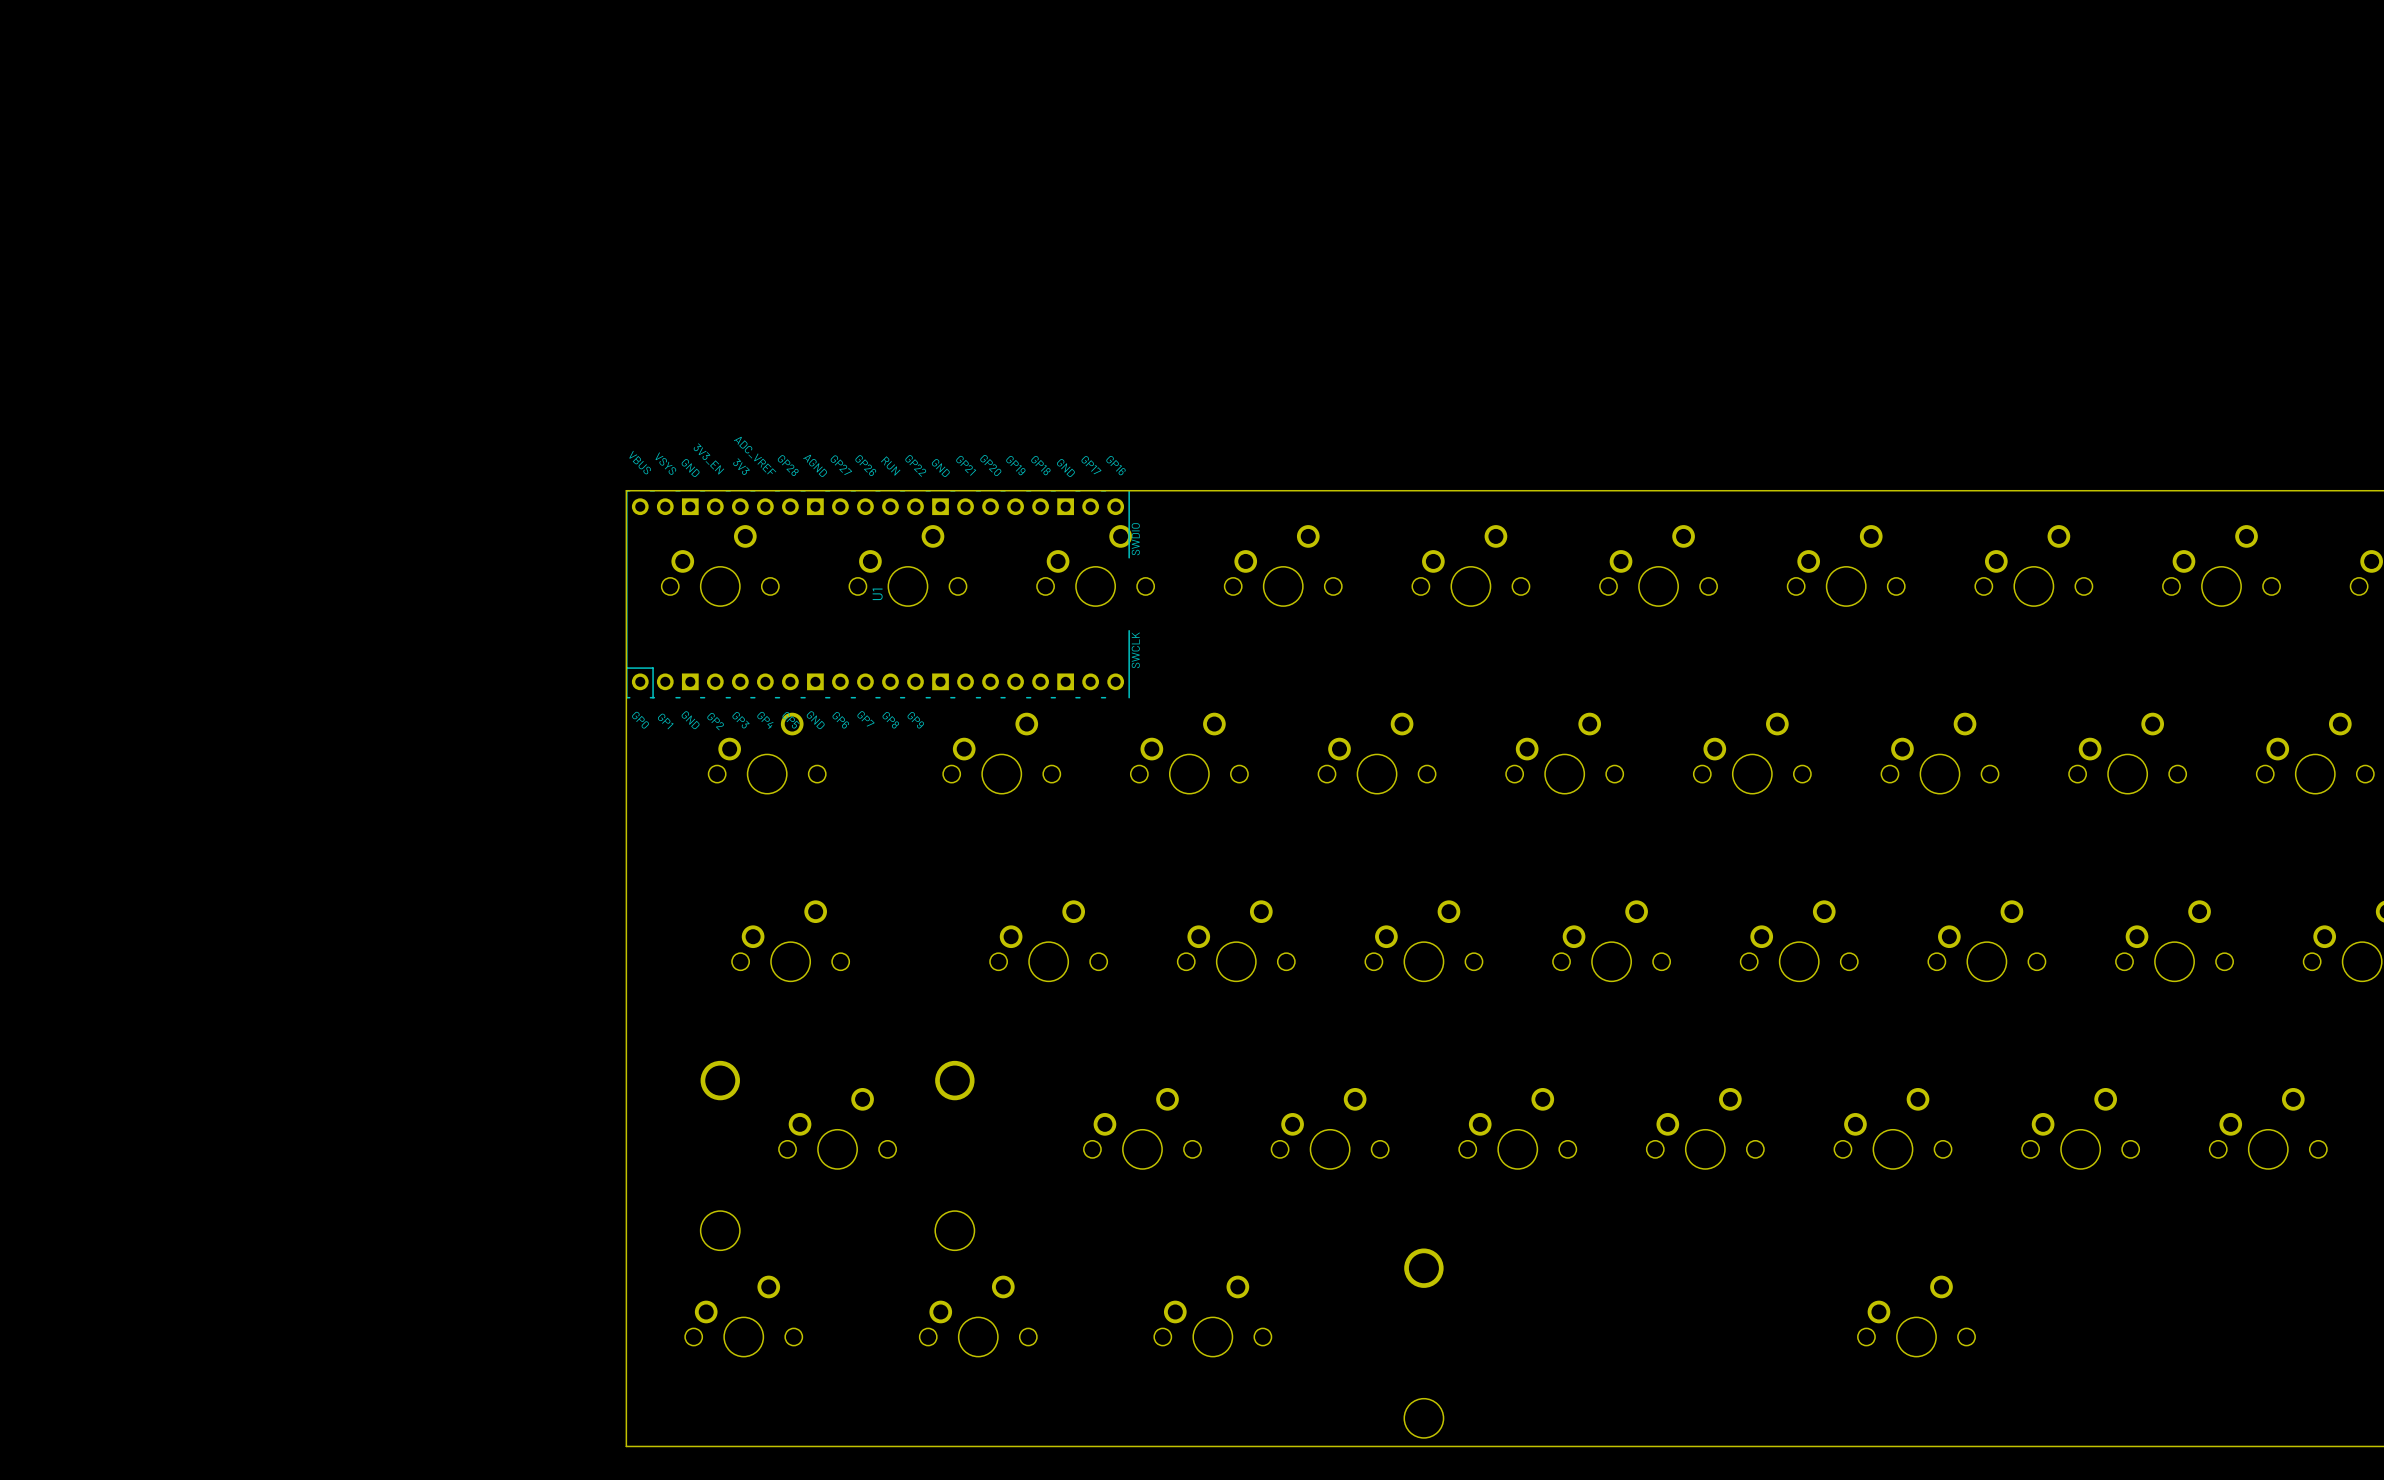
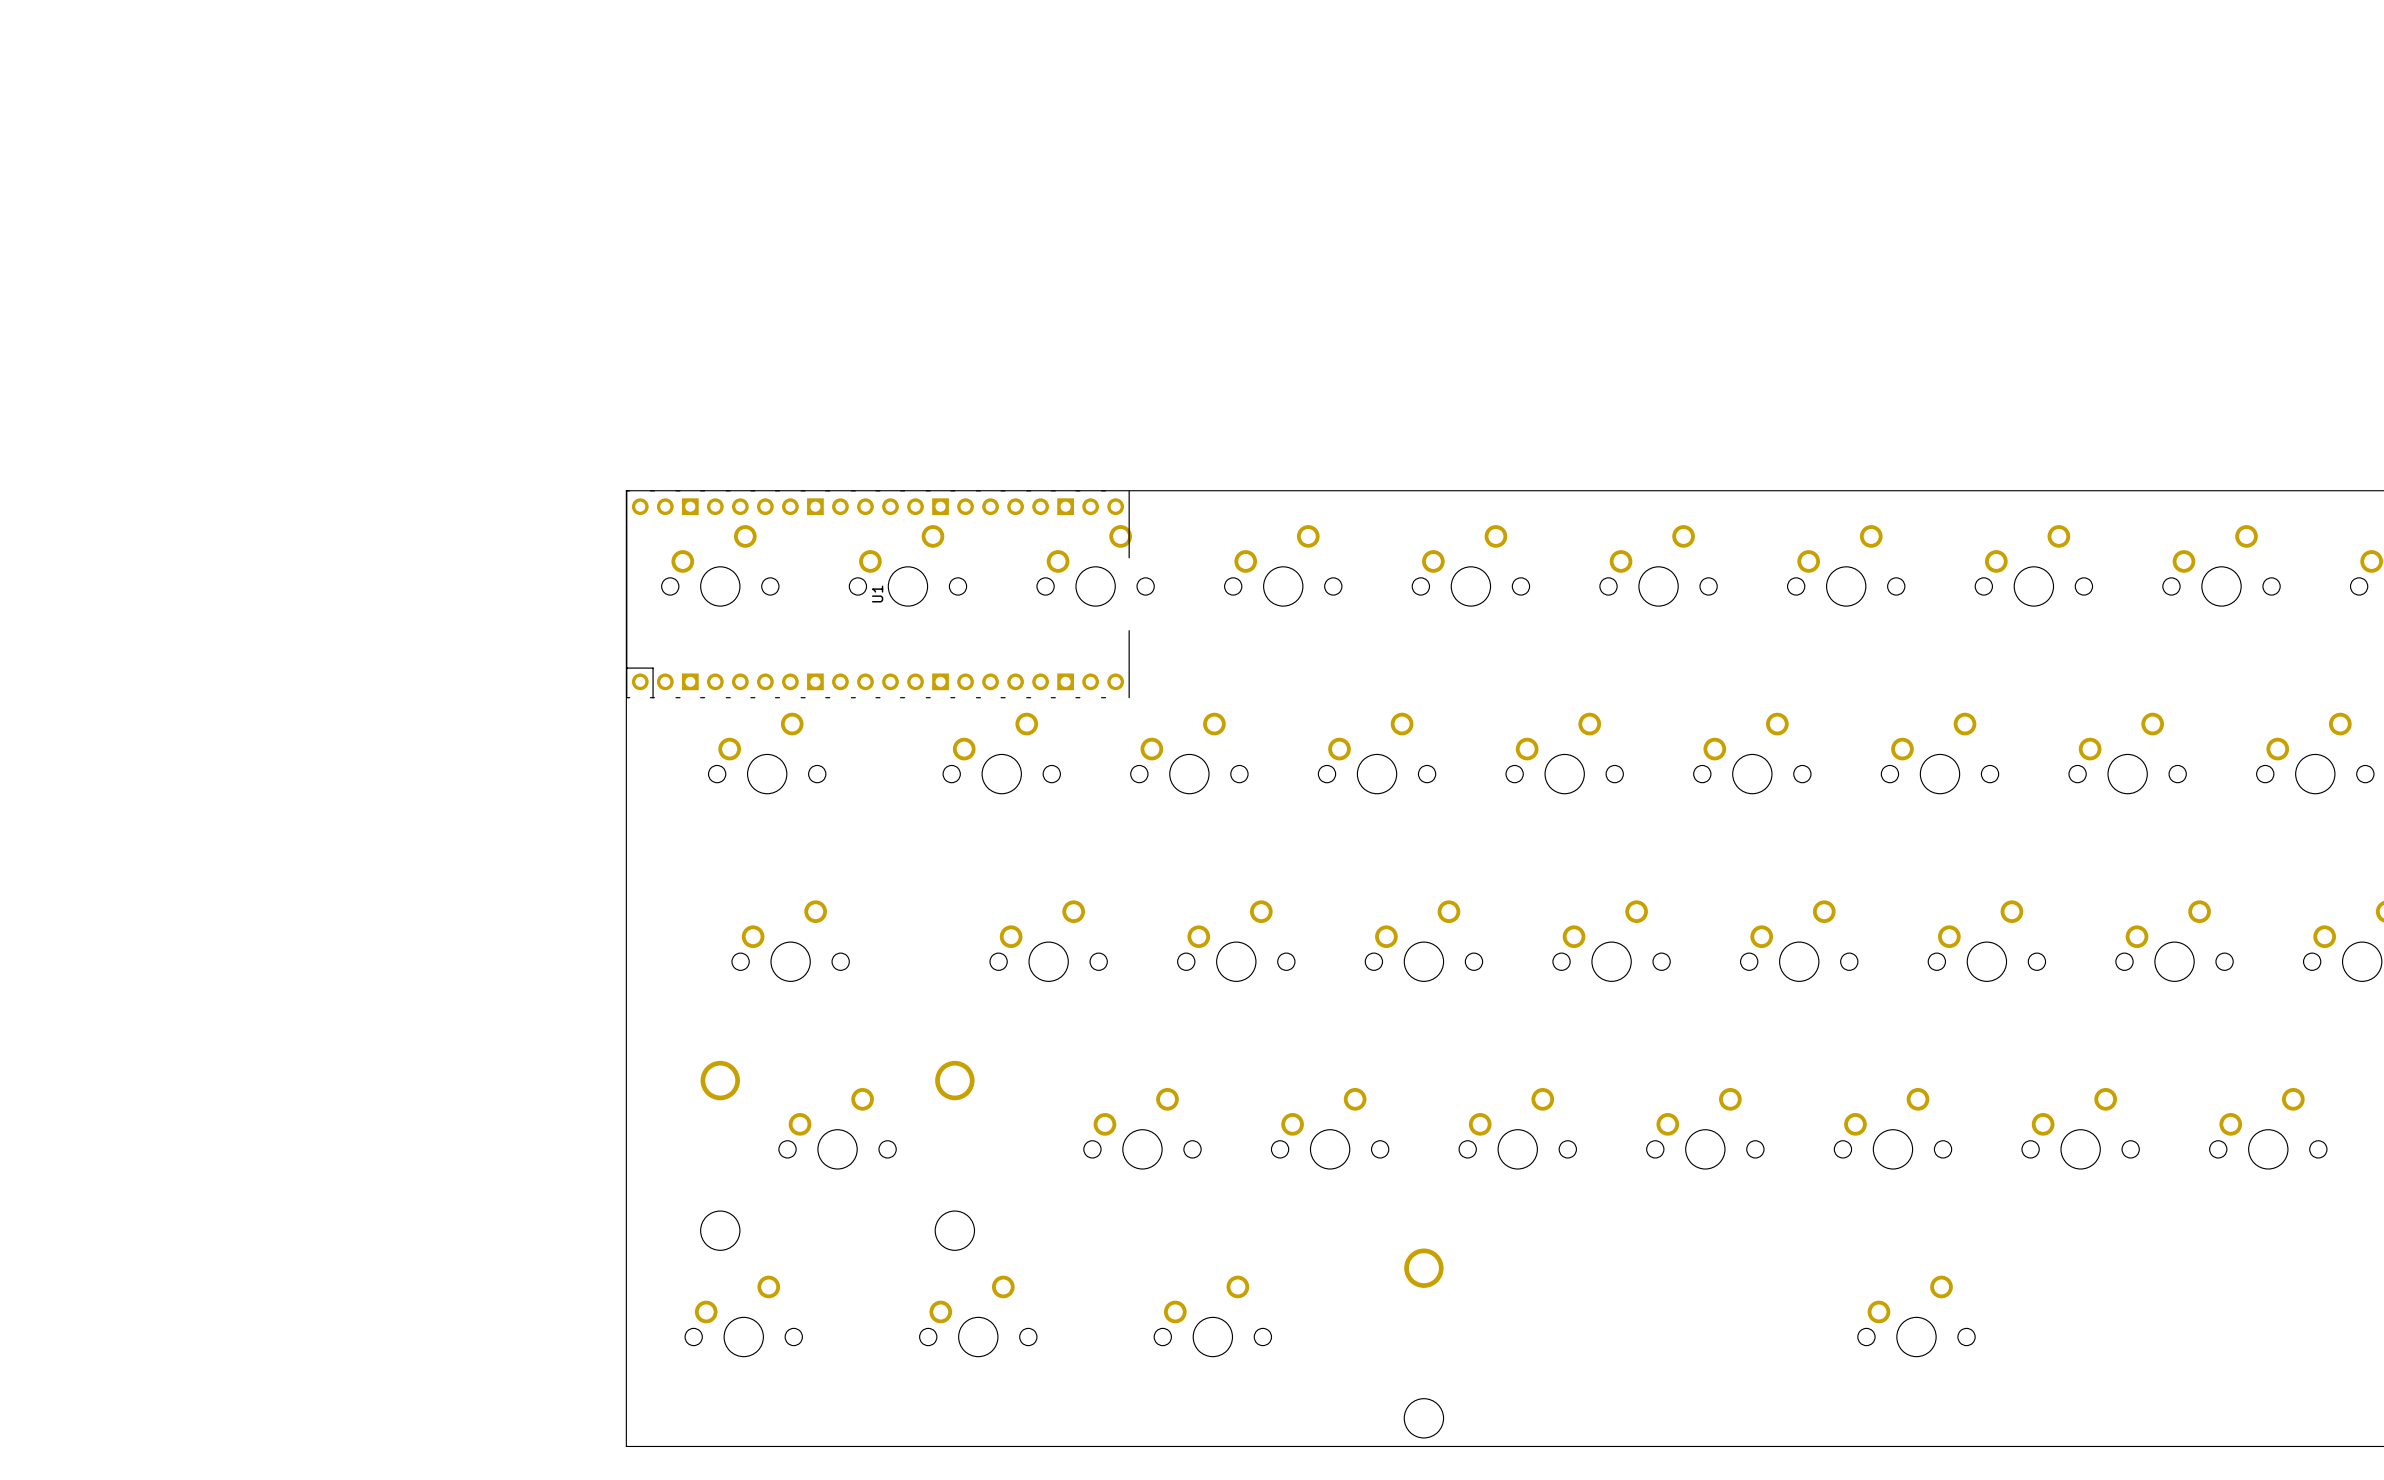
U1 footprint: [626, 490, 1130, 699] -> [626, 490, 1130, 699]

